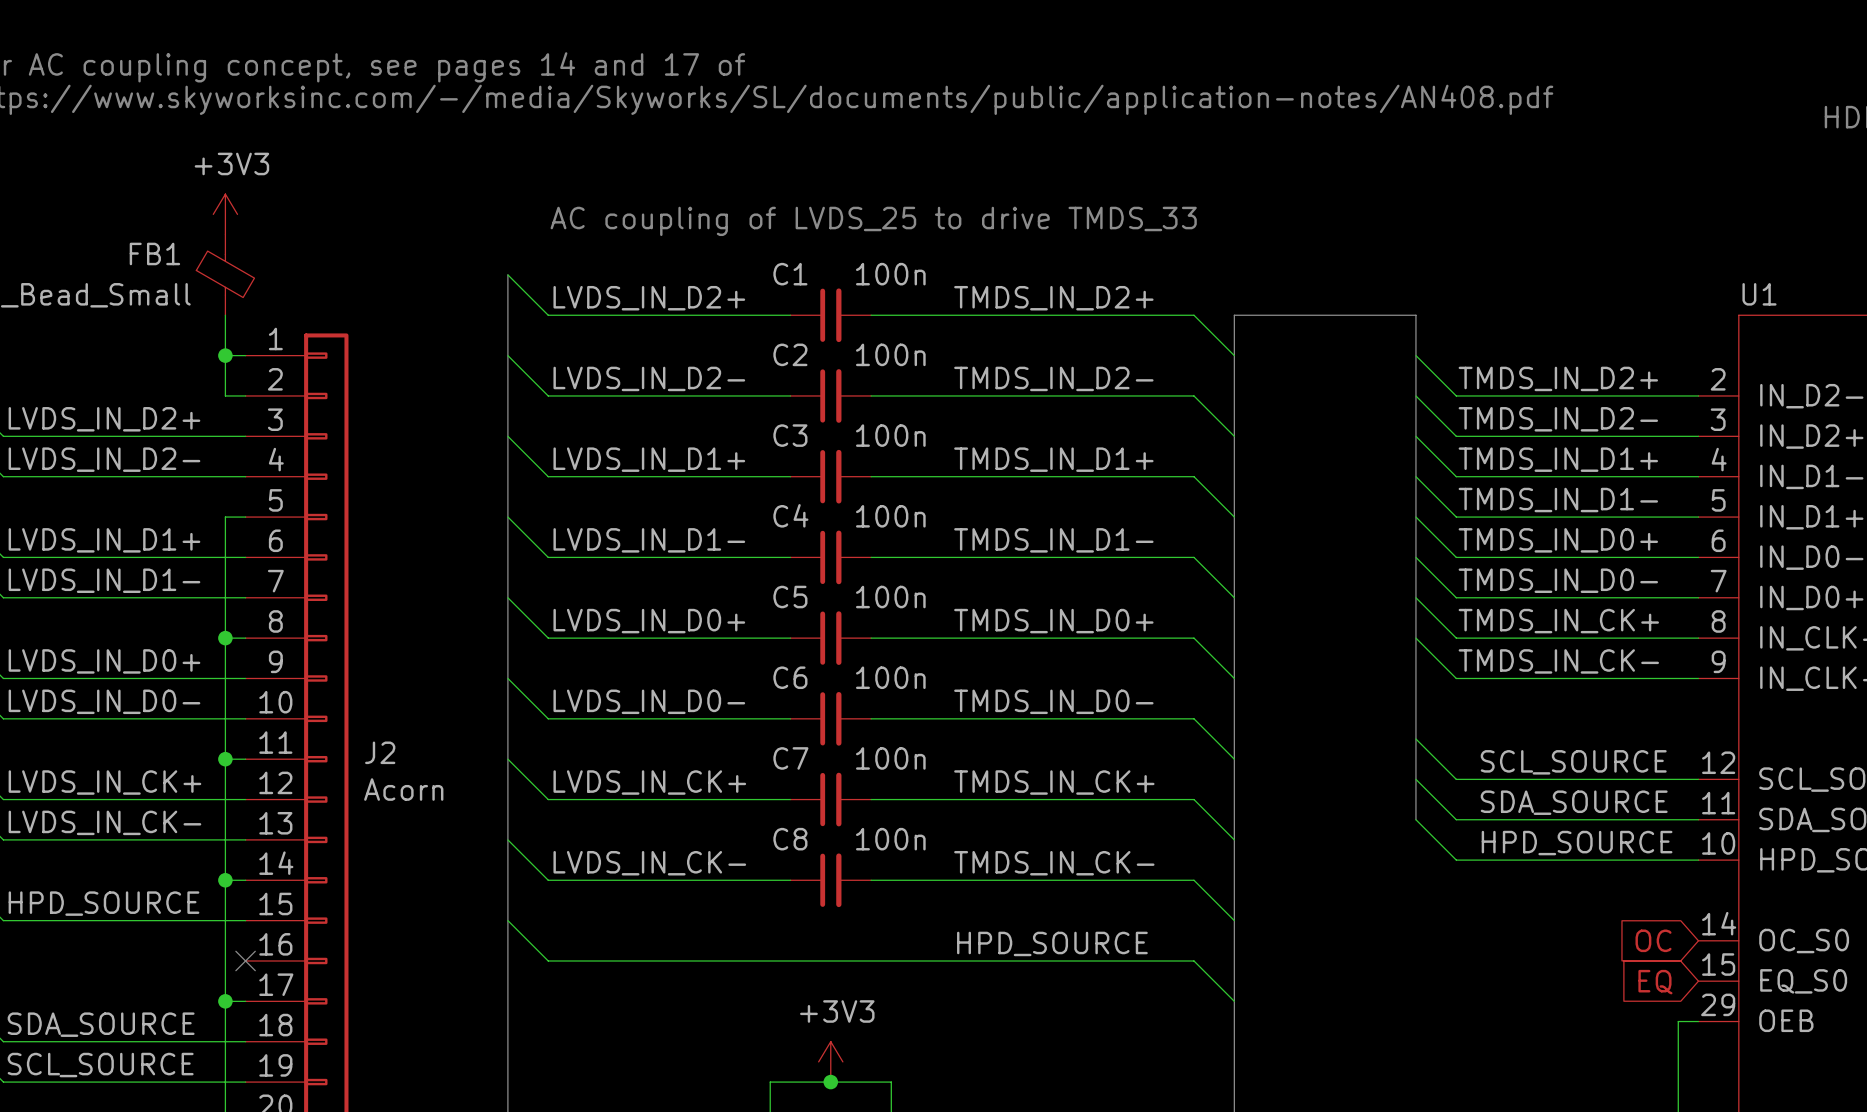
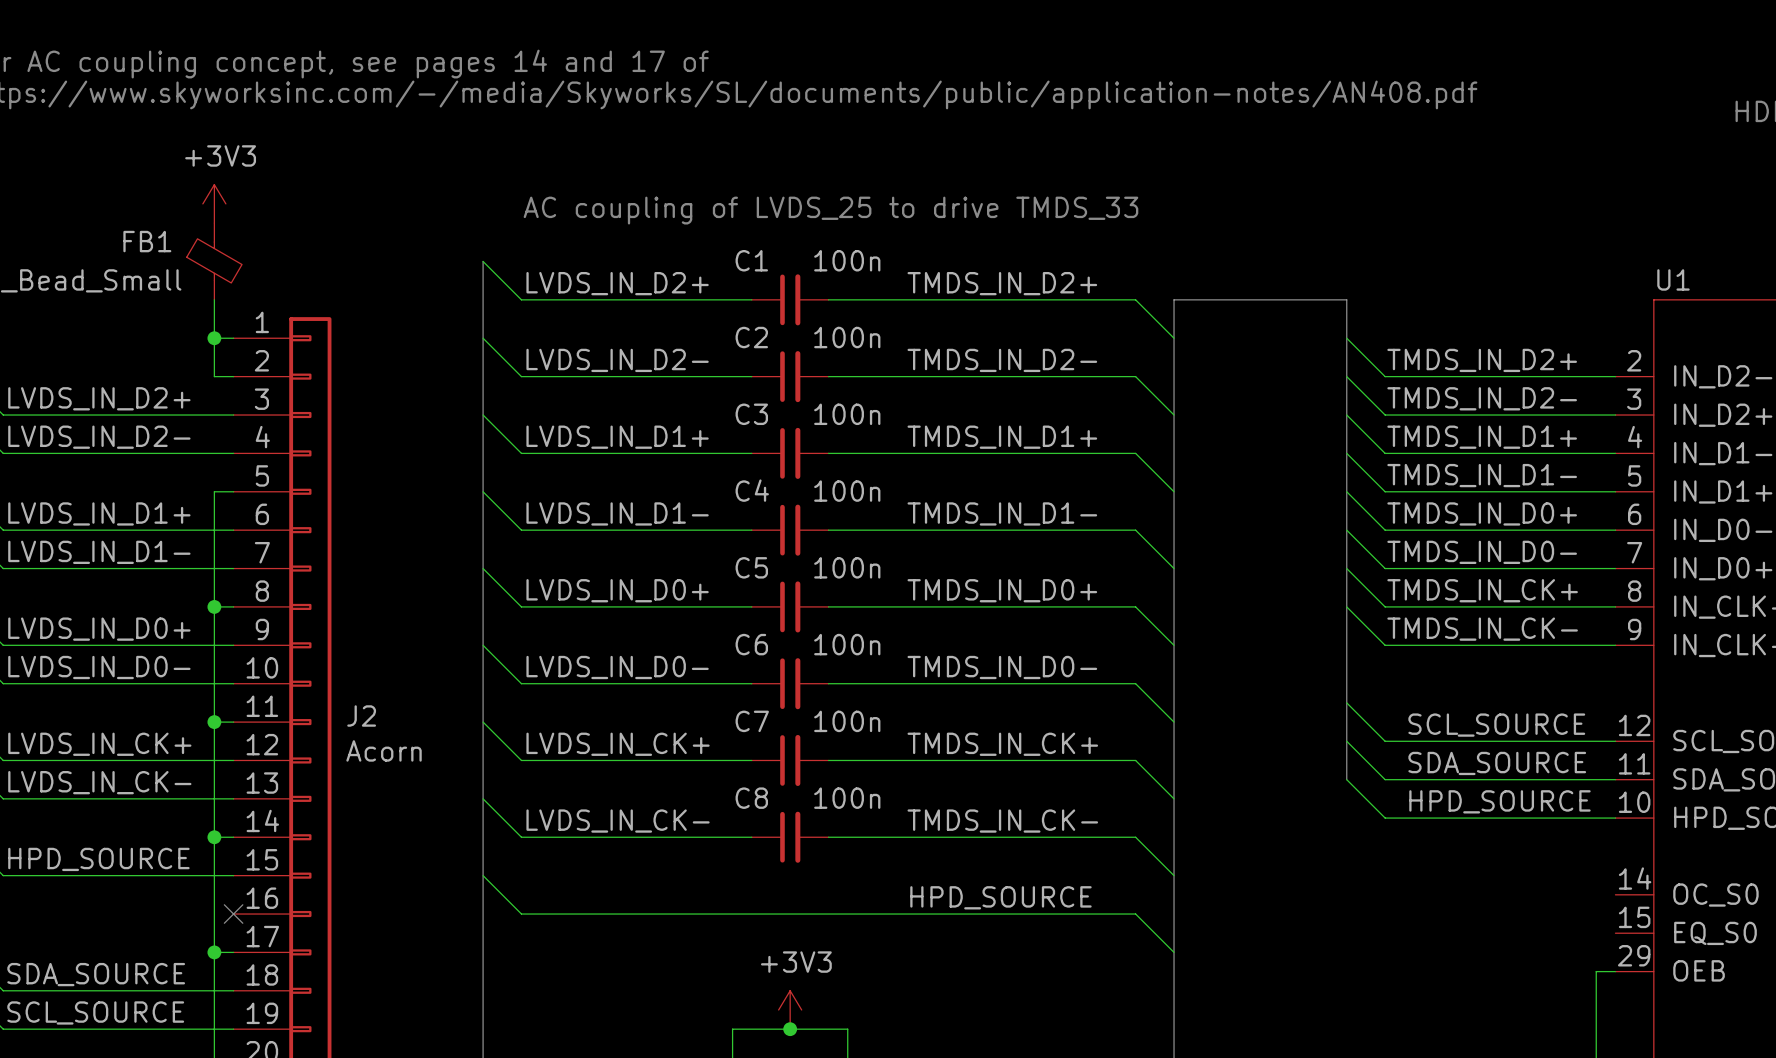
global label: OC (1653, 940) -> none
global label: EQ (1655, 982) -> none

